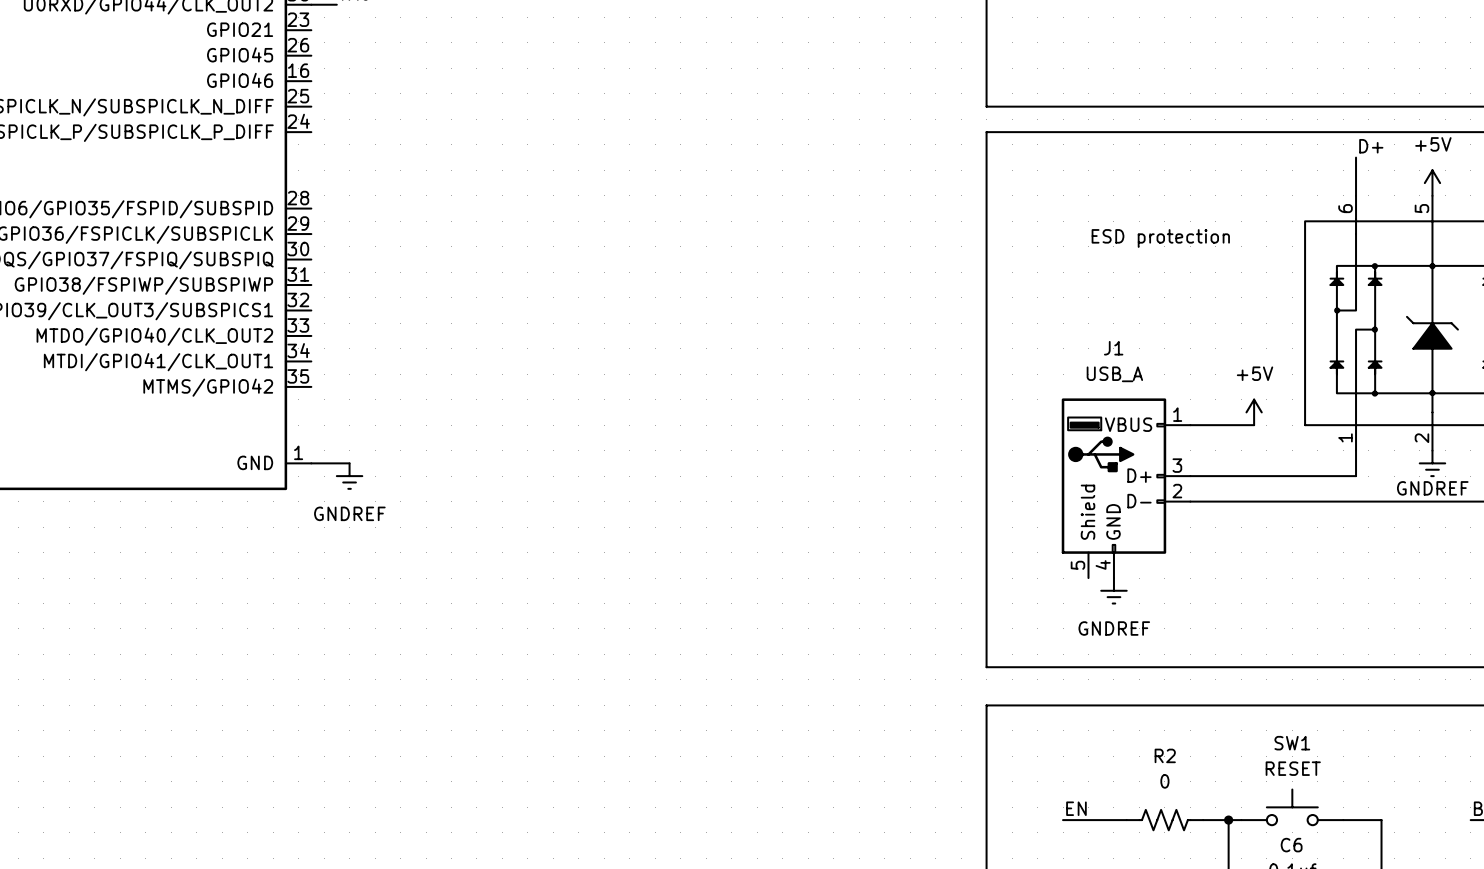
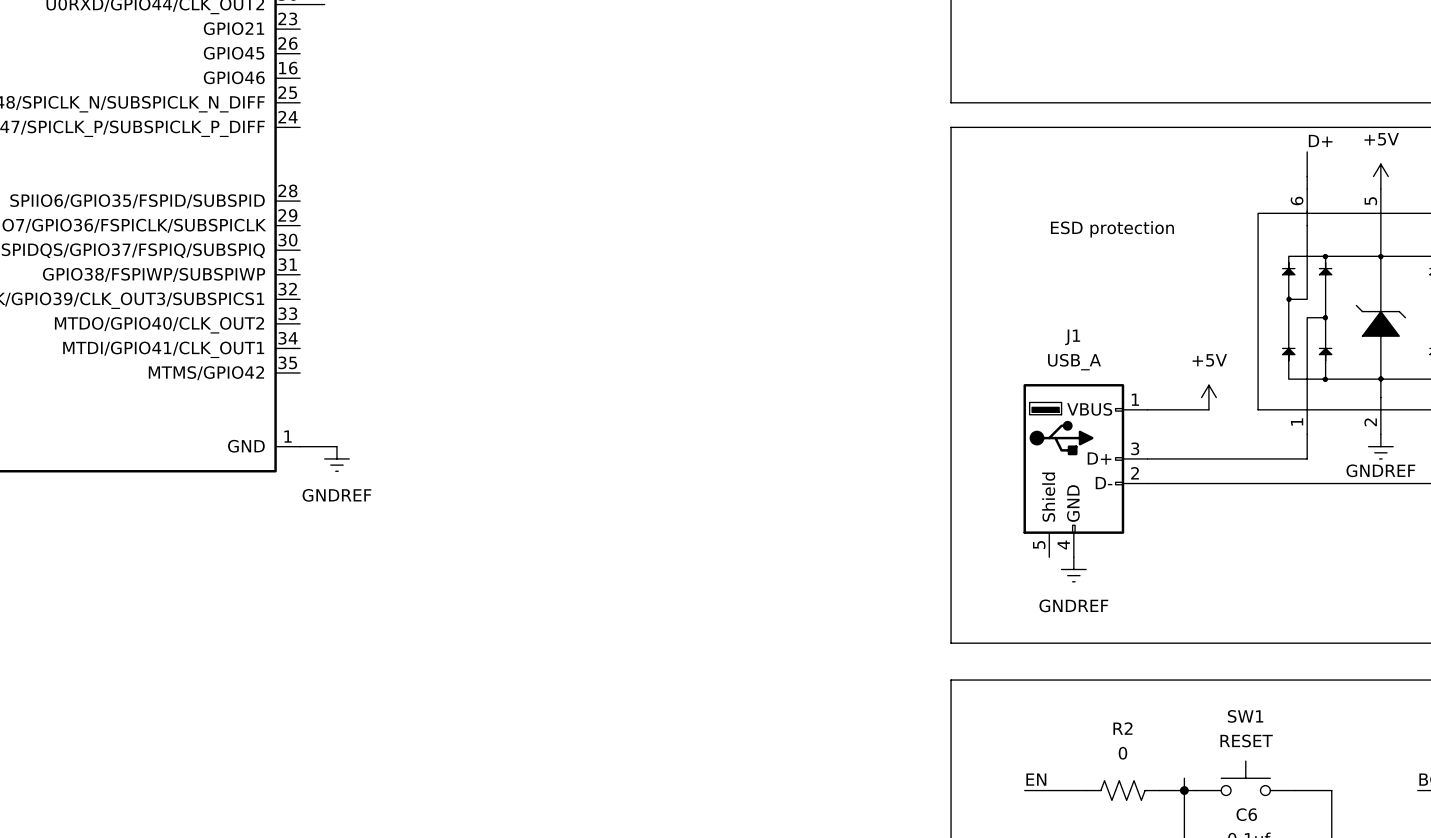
wire: none -> (1184, 778) (1184, 790)

